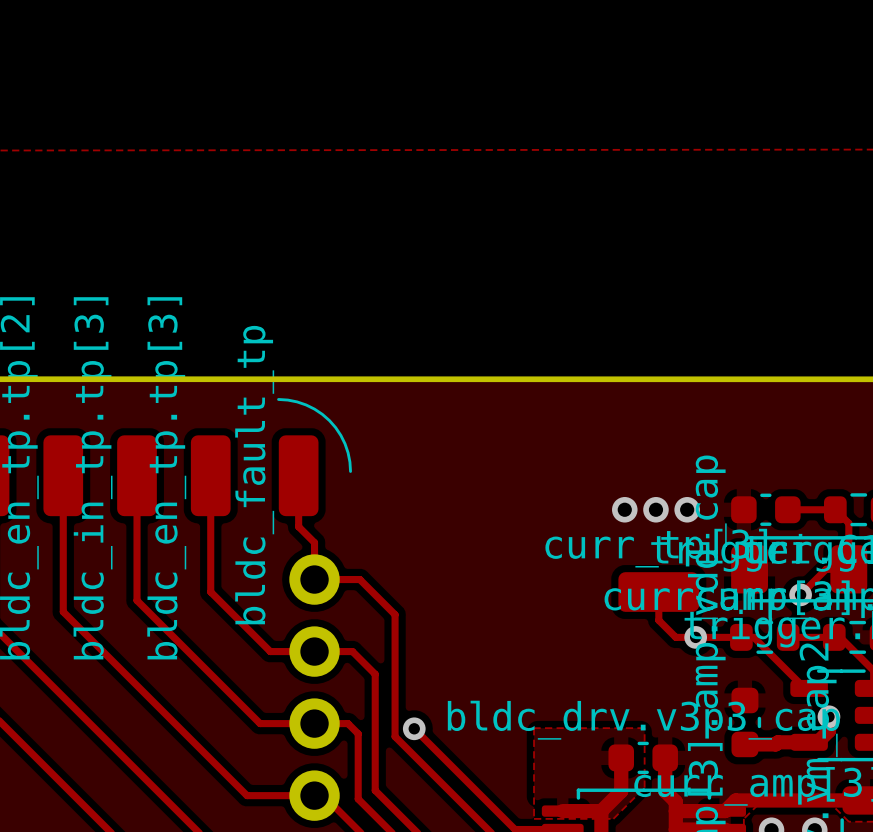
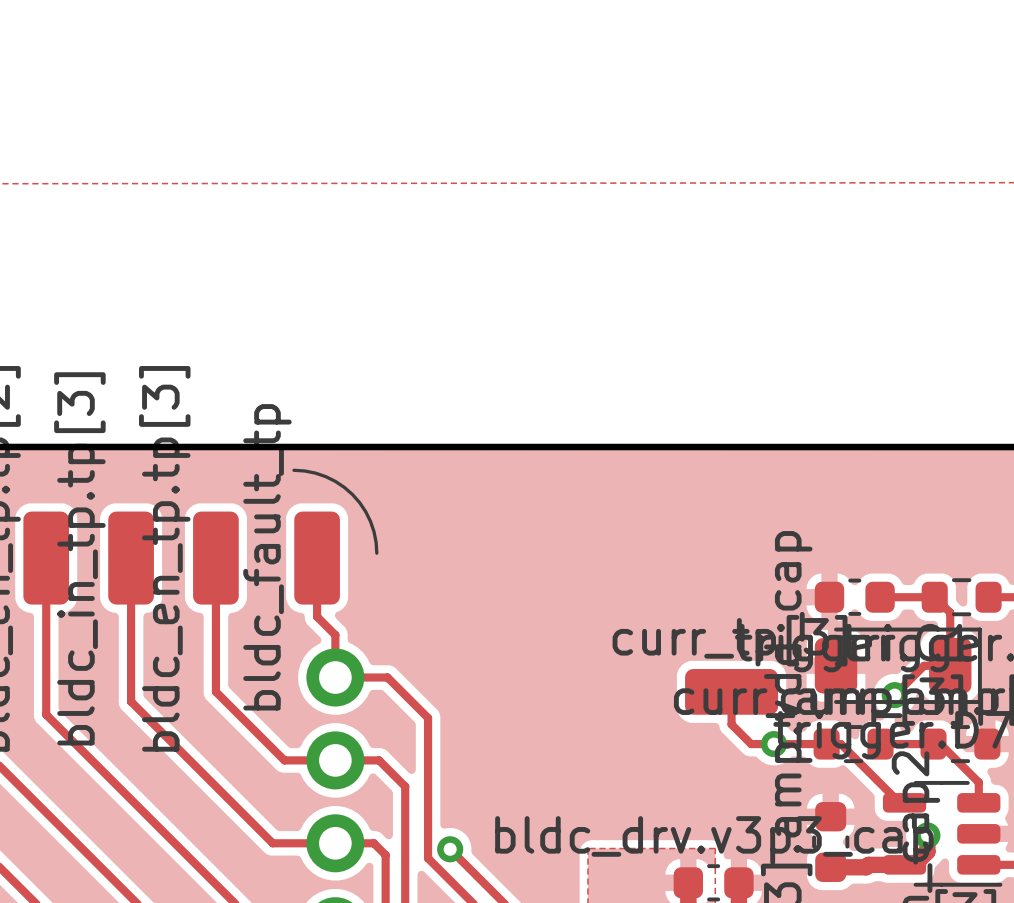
via: (624, 509) -> none
via: (655, 509) -> none
via: (687, 509) -> none

